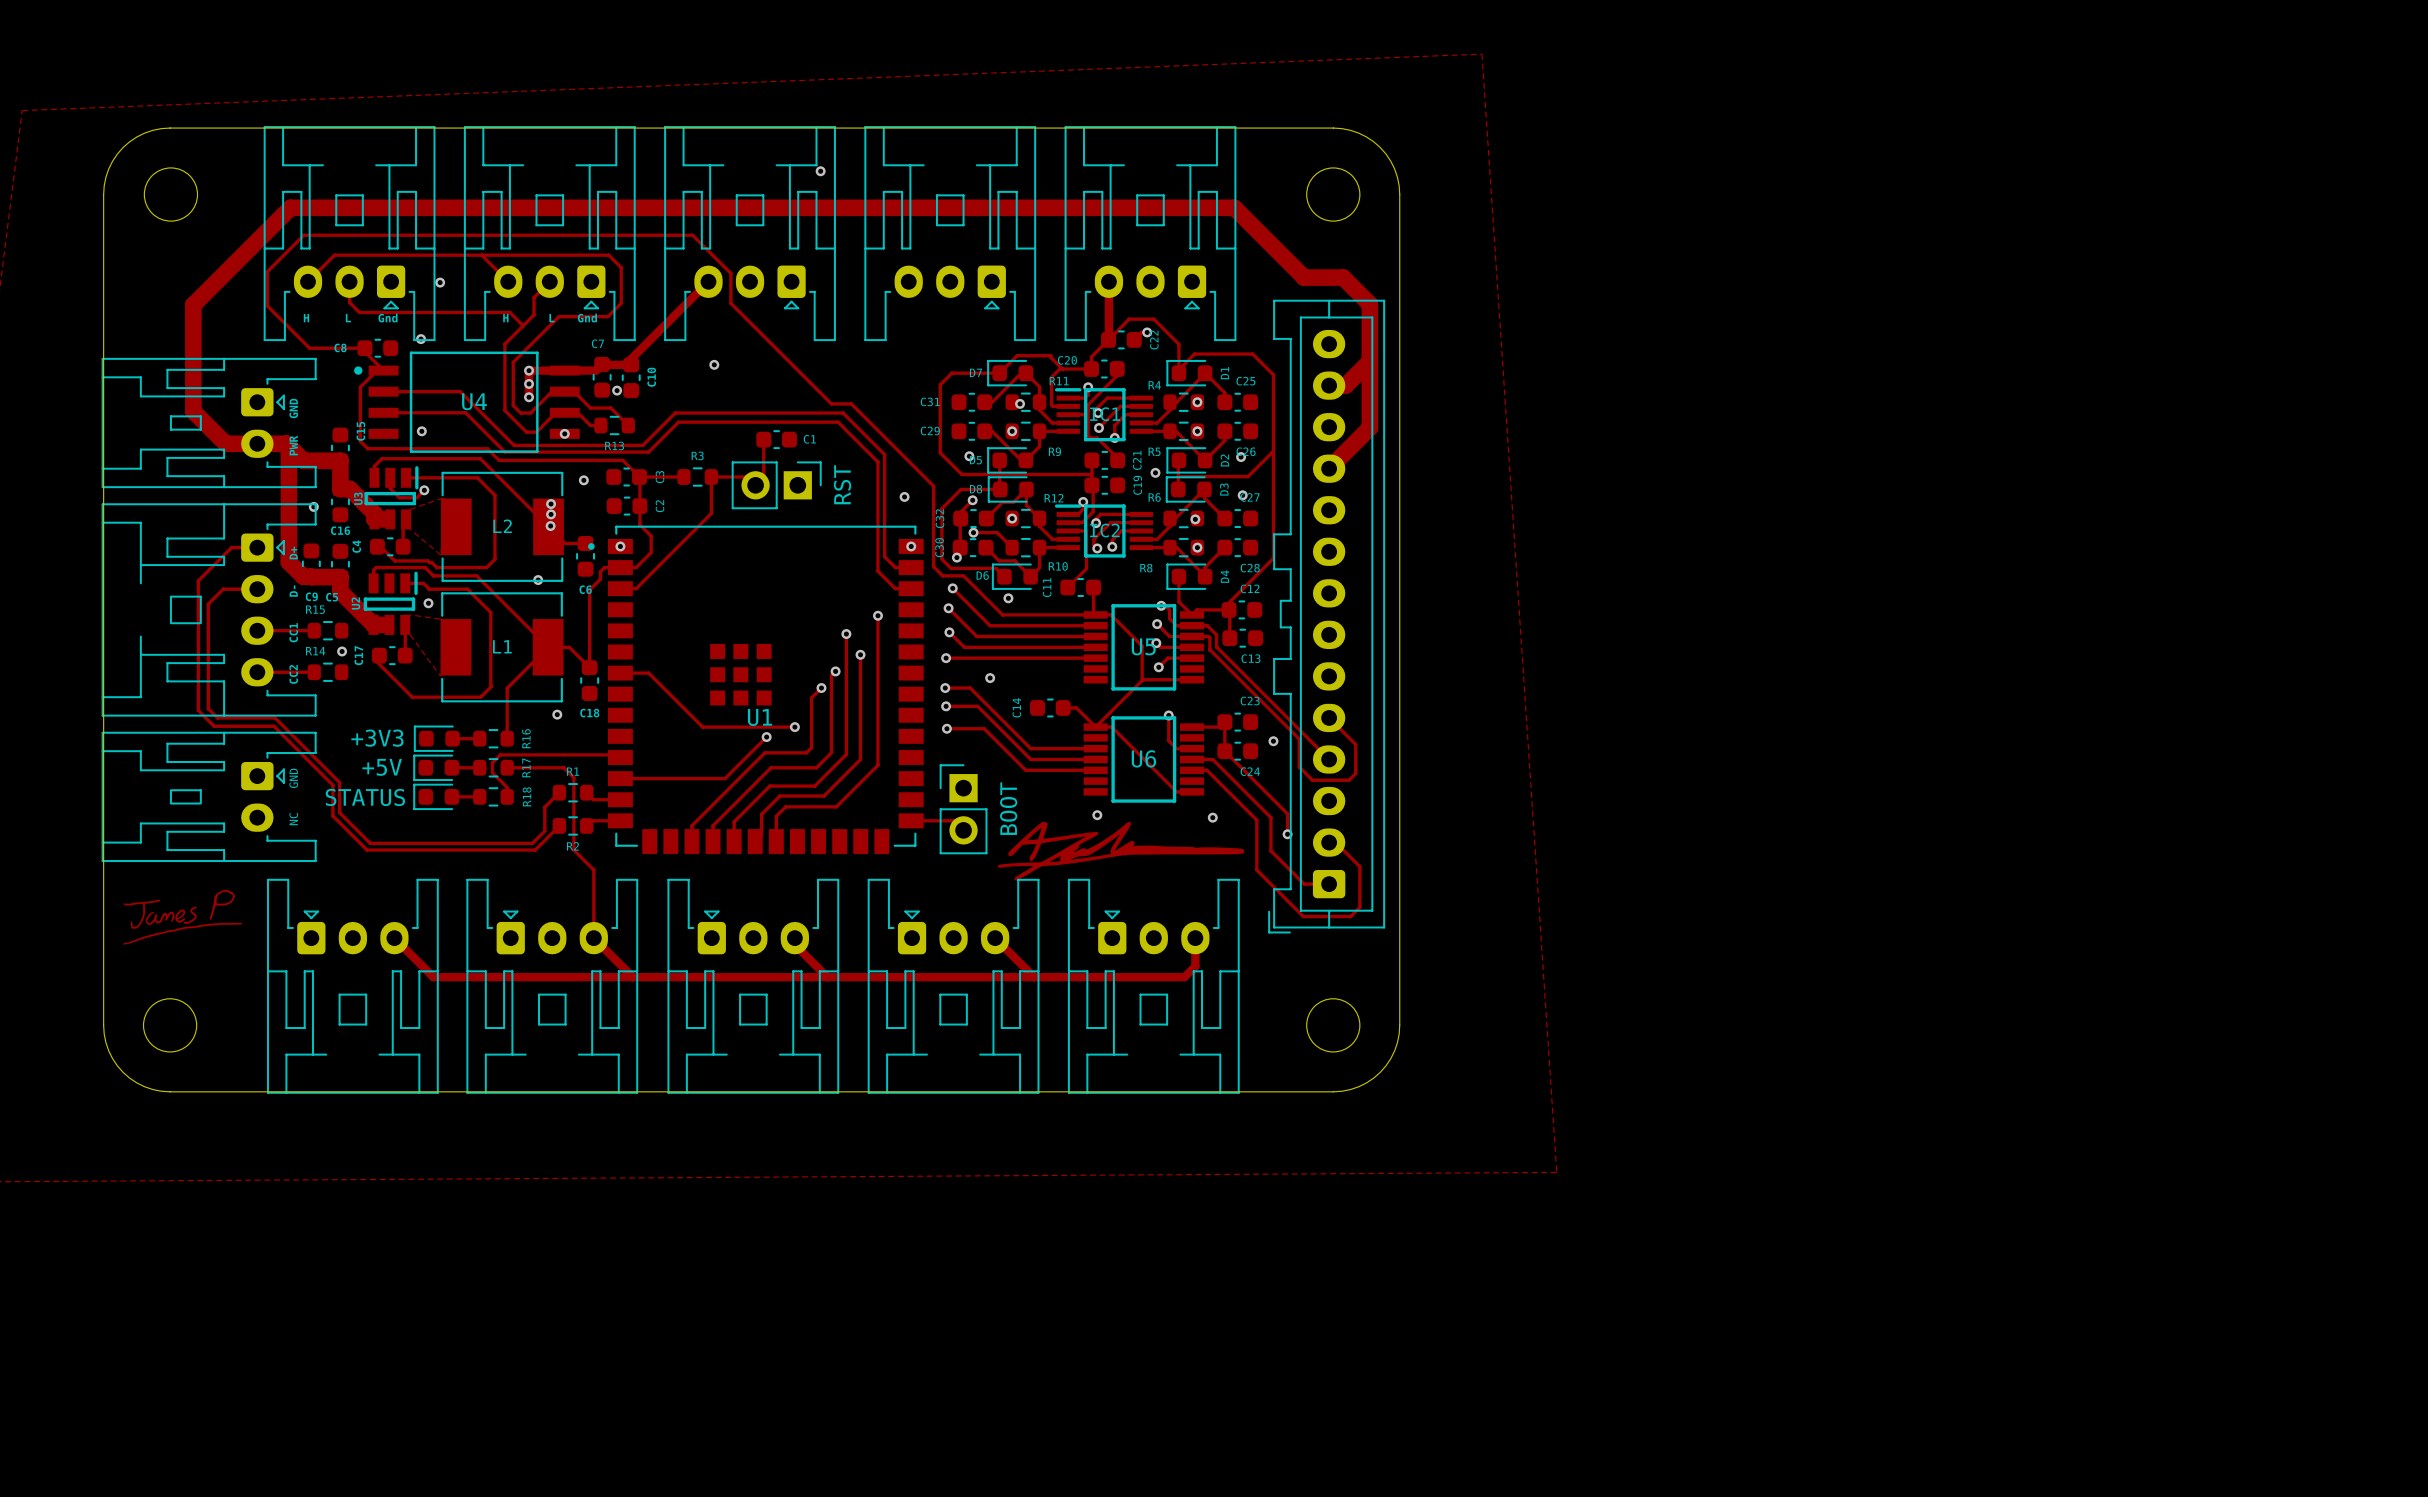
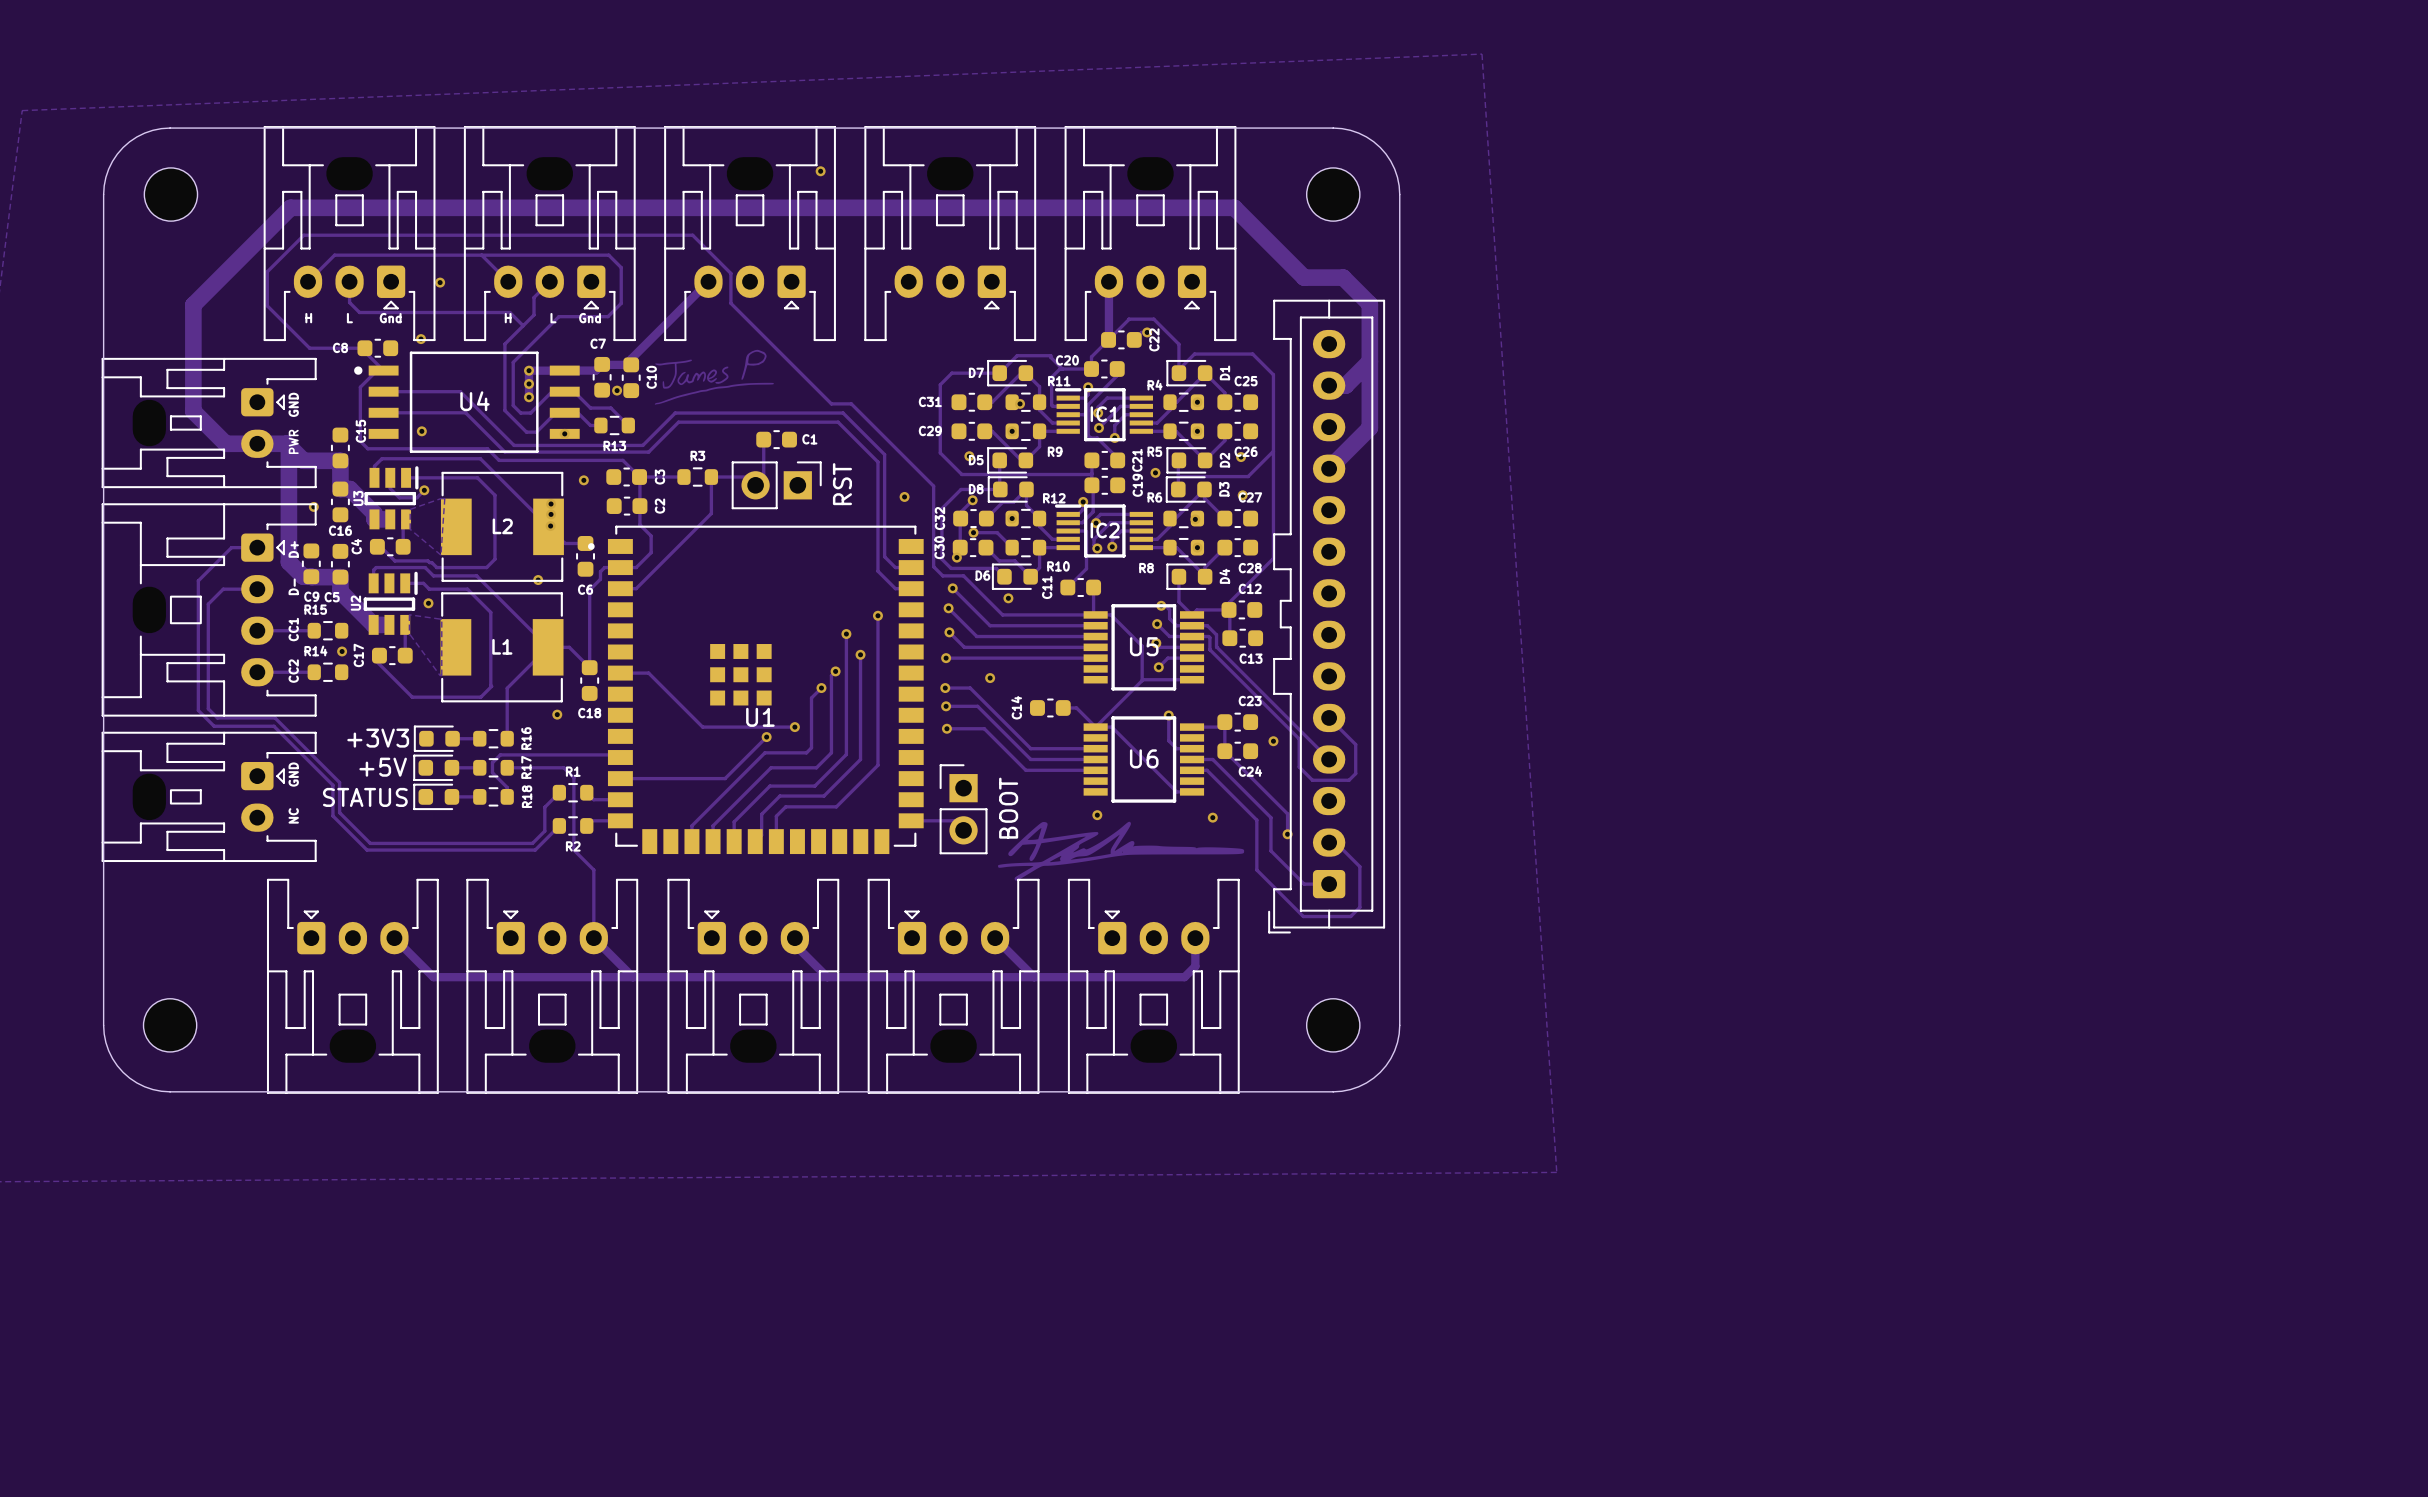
drawing: none -> [654, 349, 774, 405]
via: (714, 364) -> none
via: (620, 546) -> none
via: (911, 546) -> none
drawing: [123, 889, 243, 945] -> none

